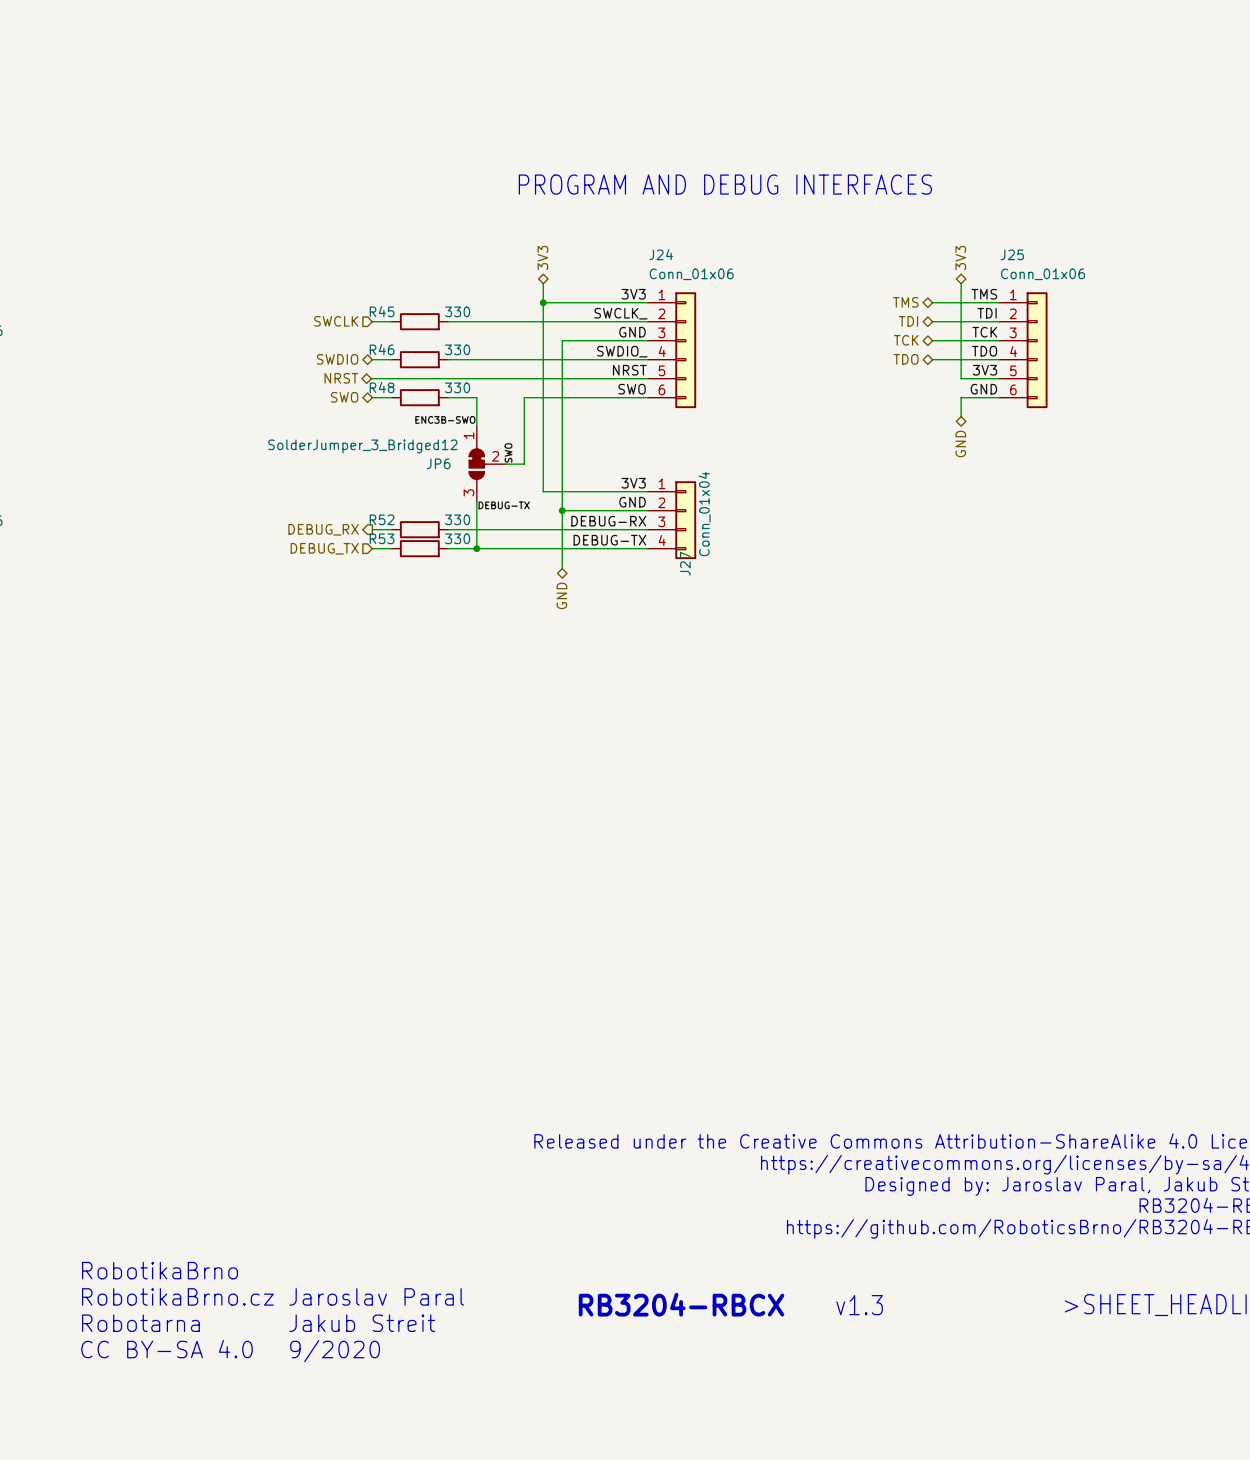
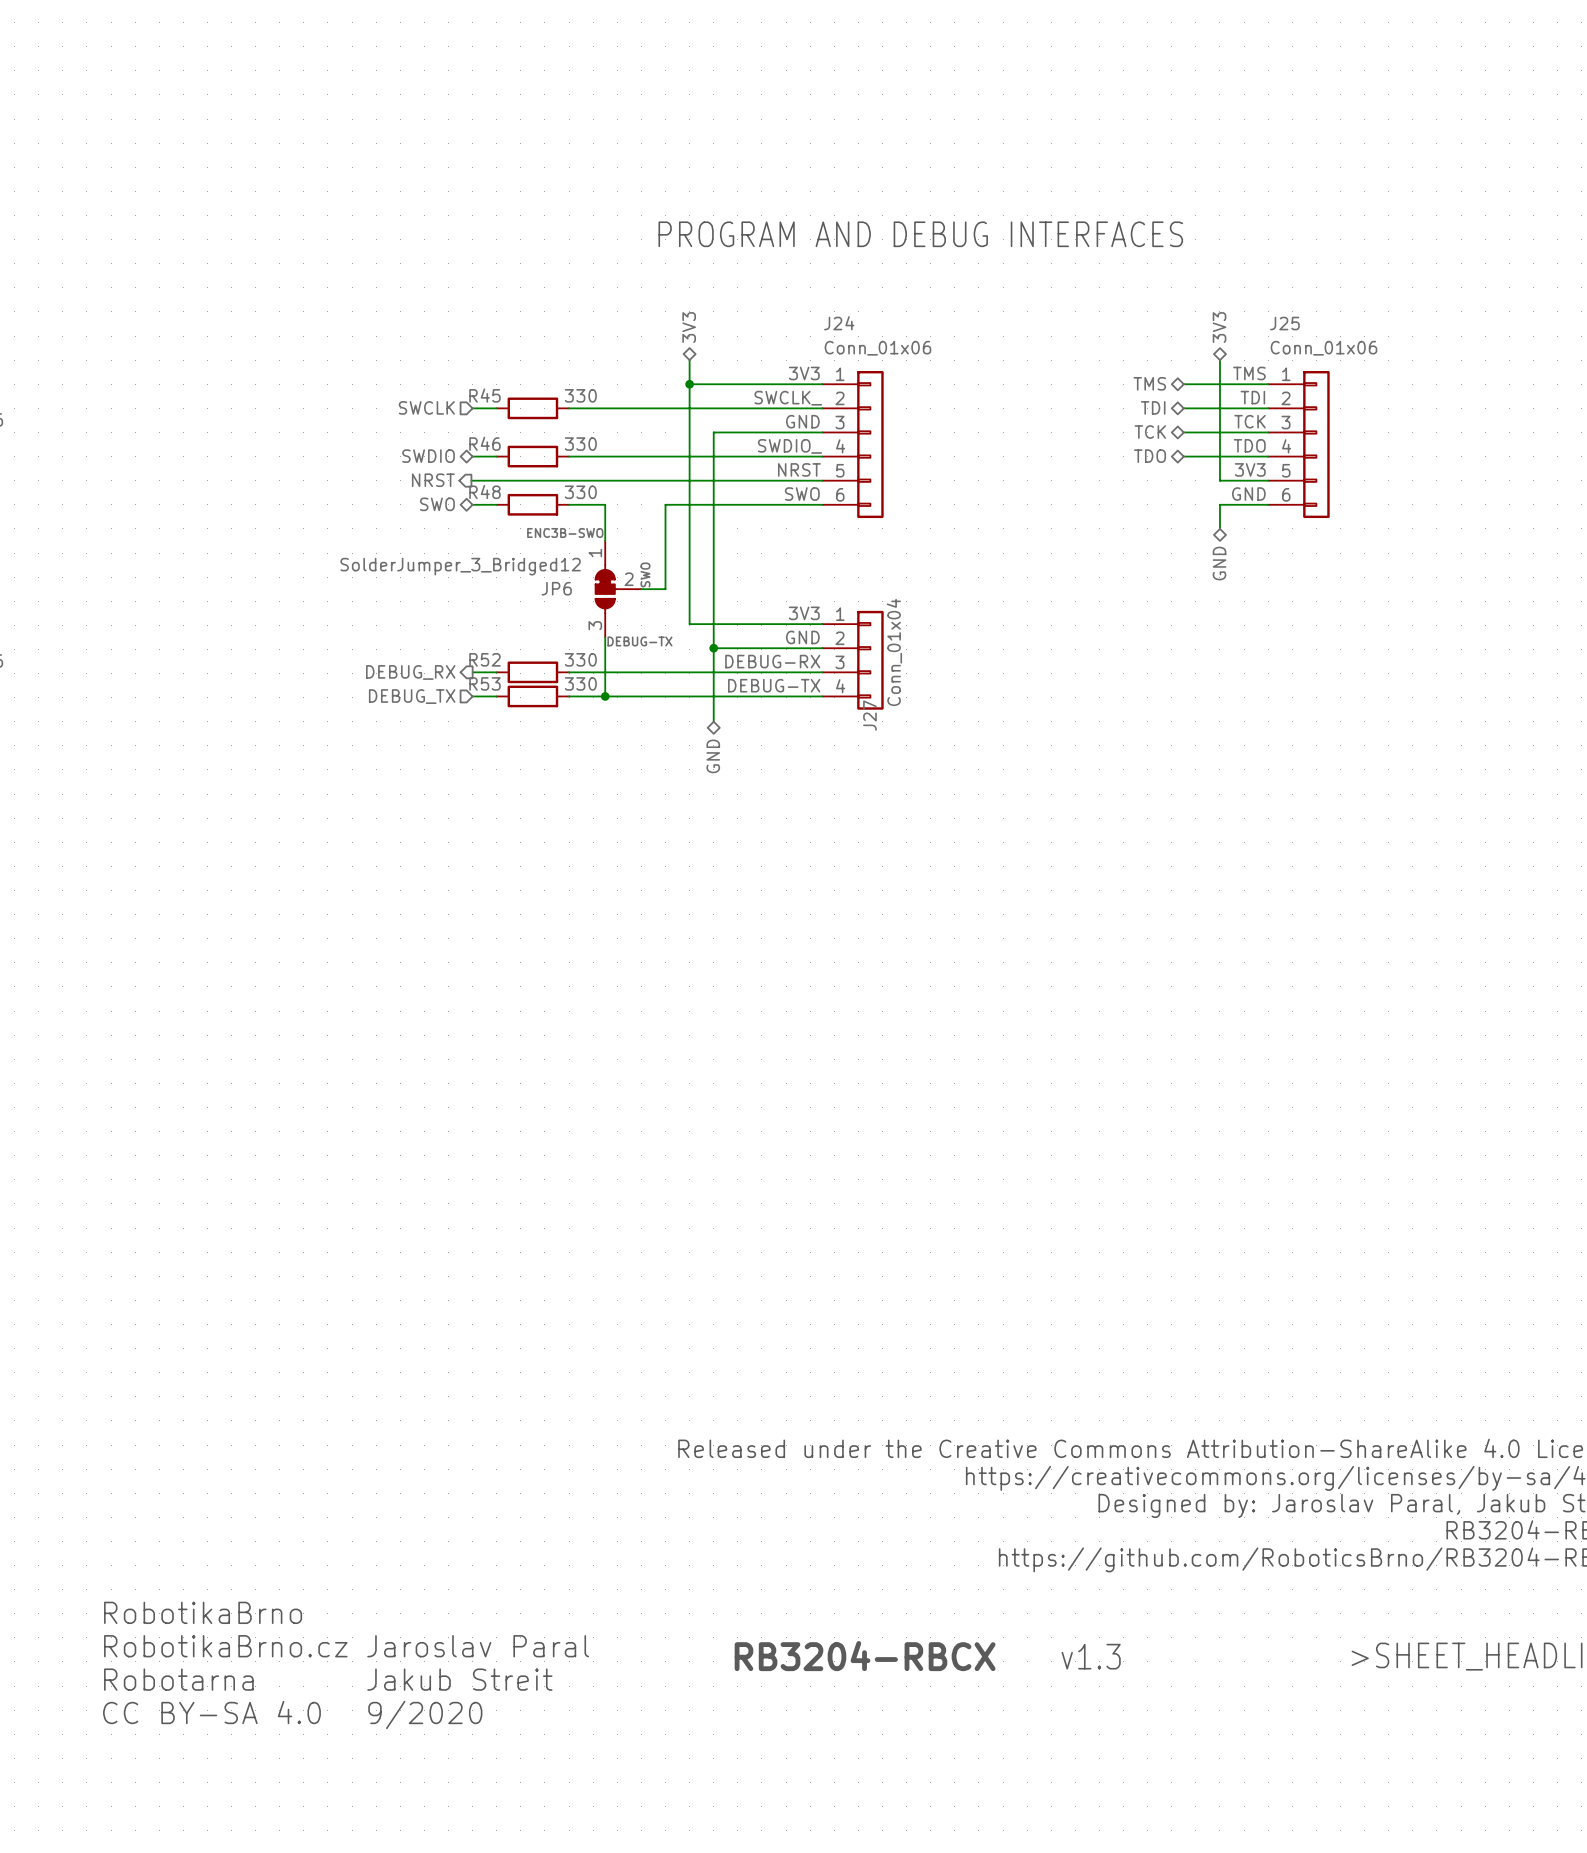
hierarchical label shape: bidirectional (341, 378) -> output (433, 480)

